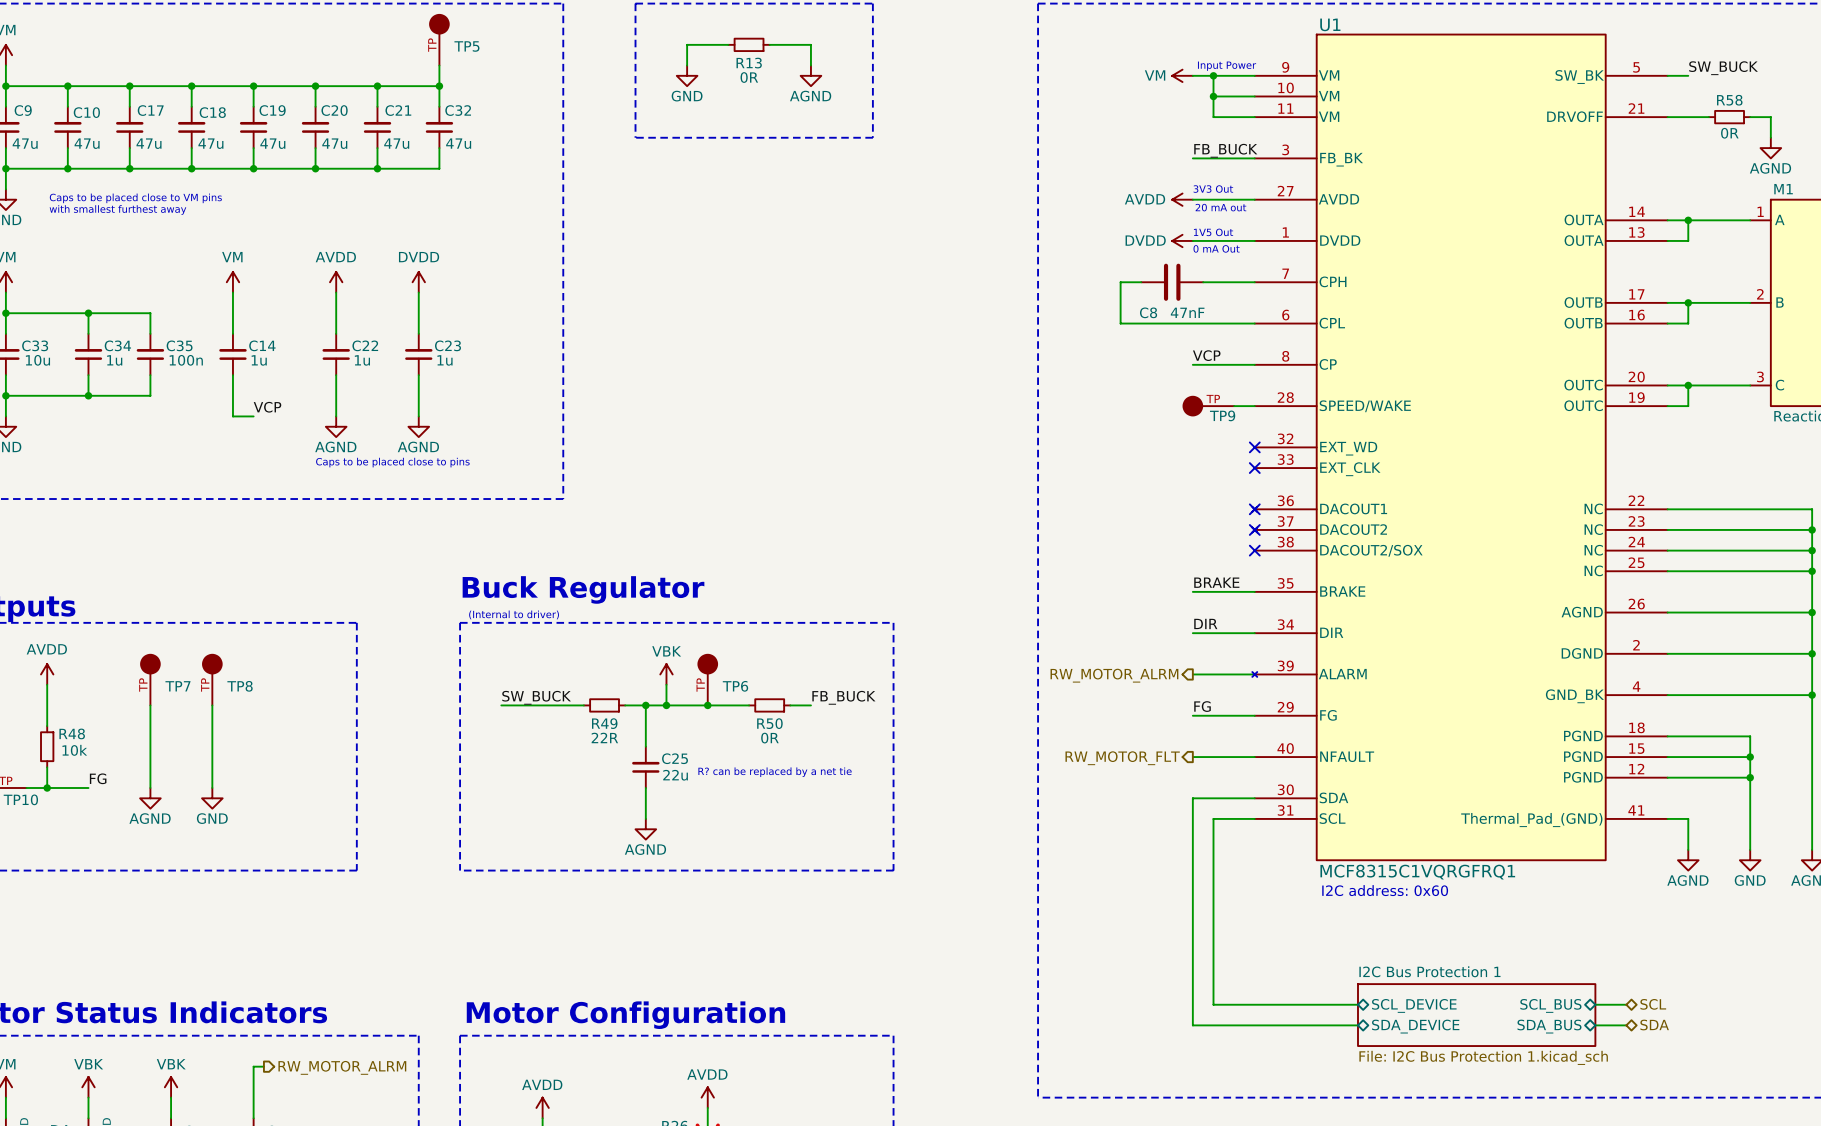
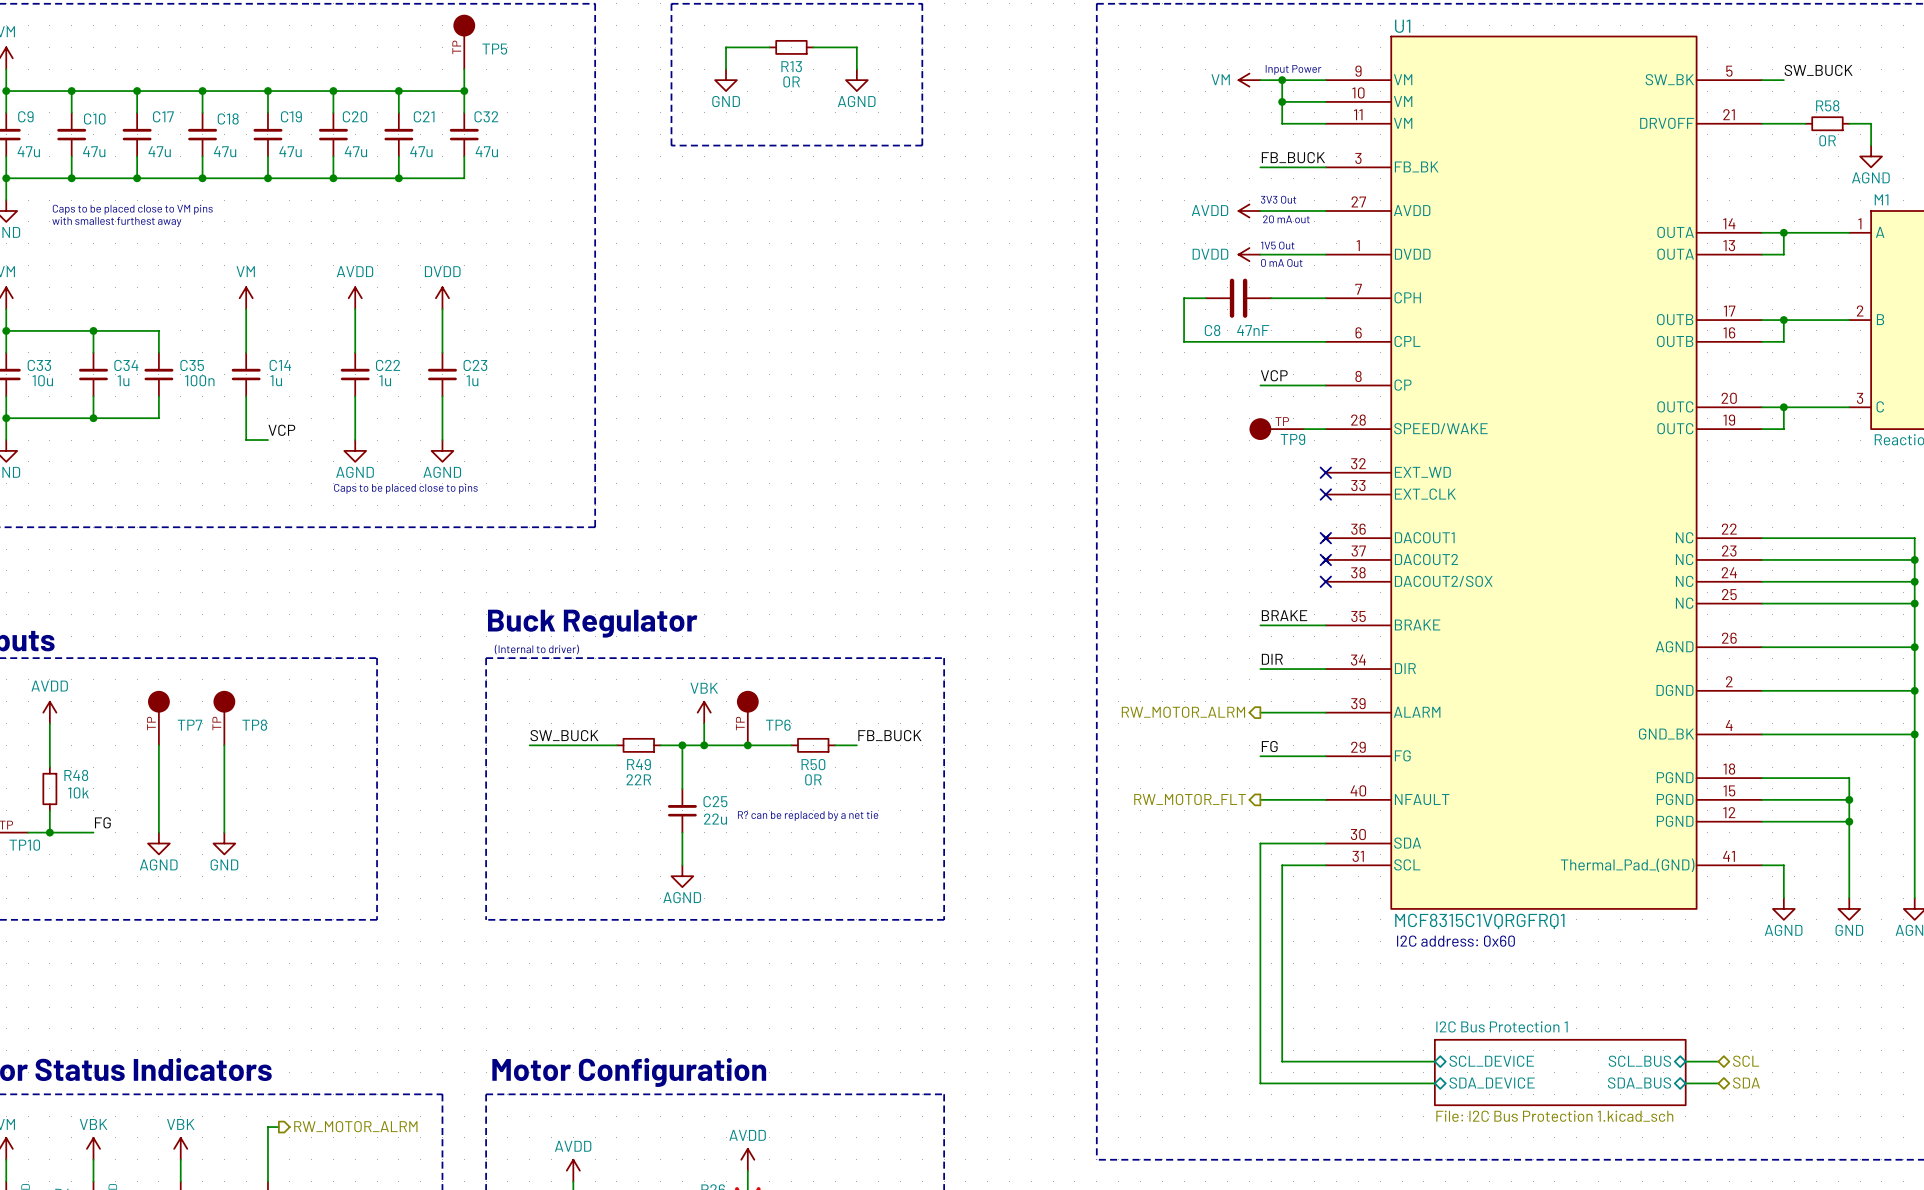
U1 symbol: [1252, 34, 1668, 861] -> [1323, 36, 1763, 909]

